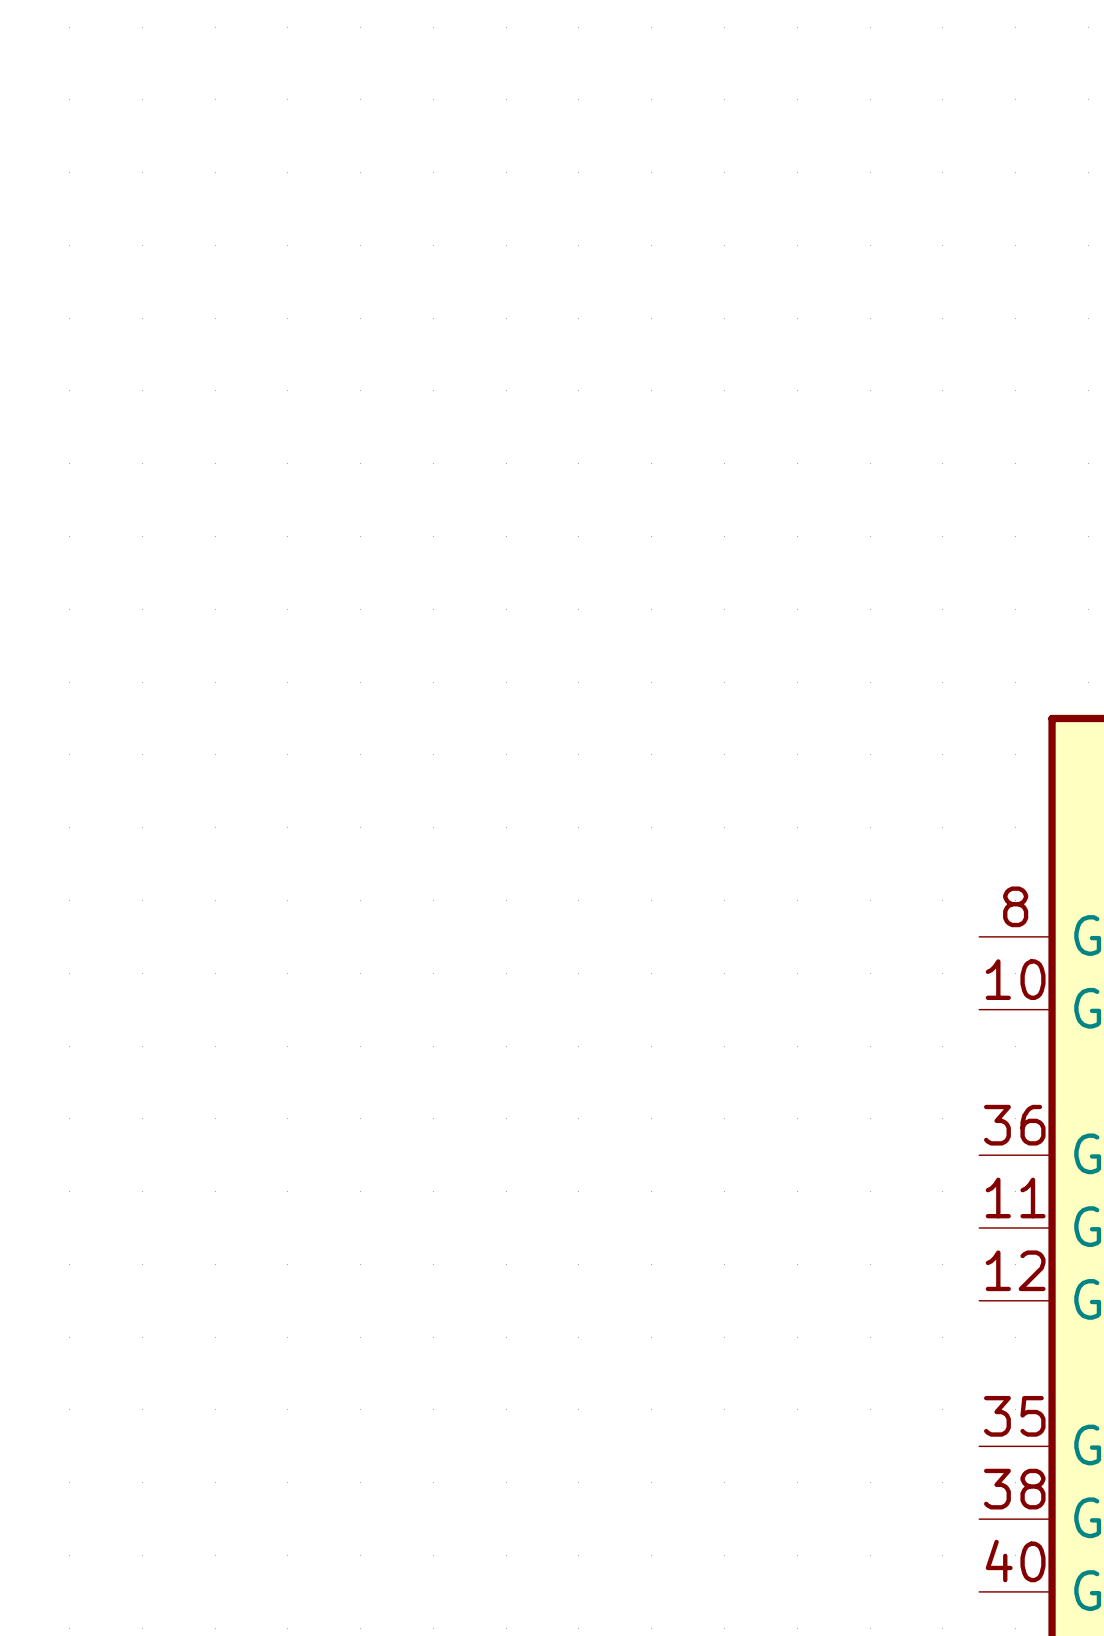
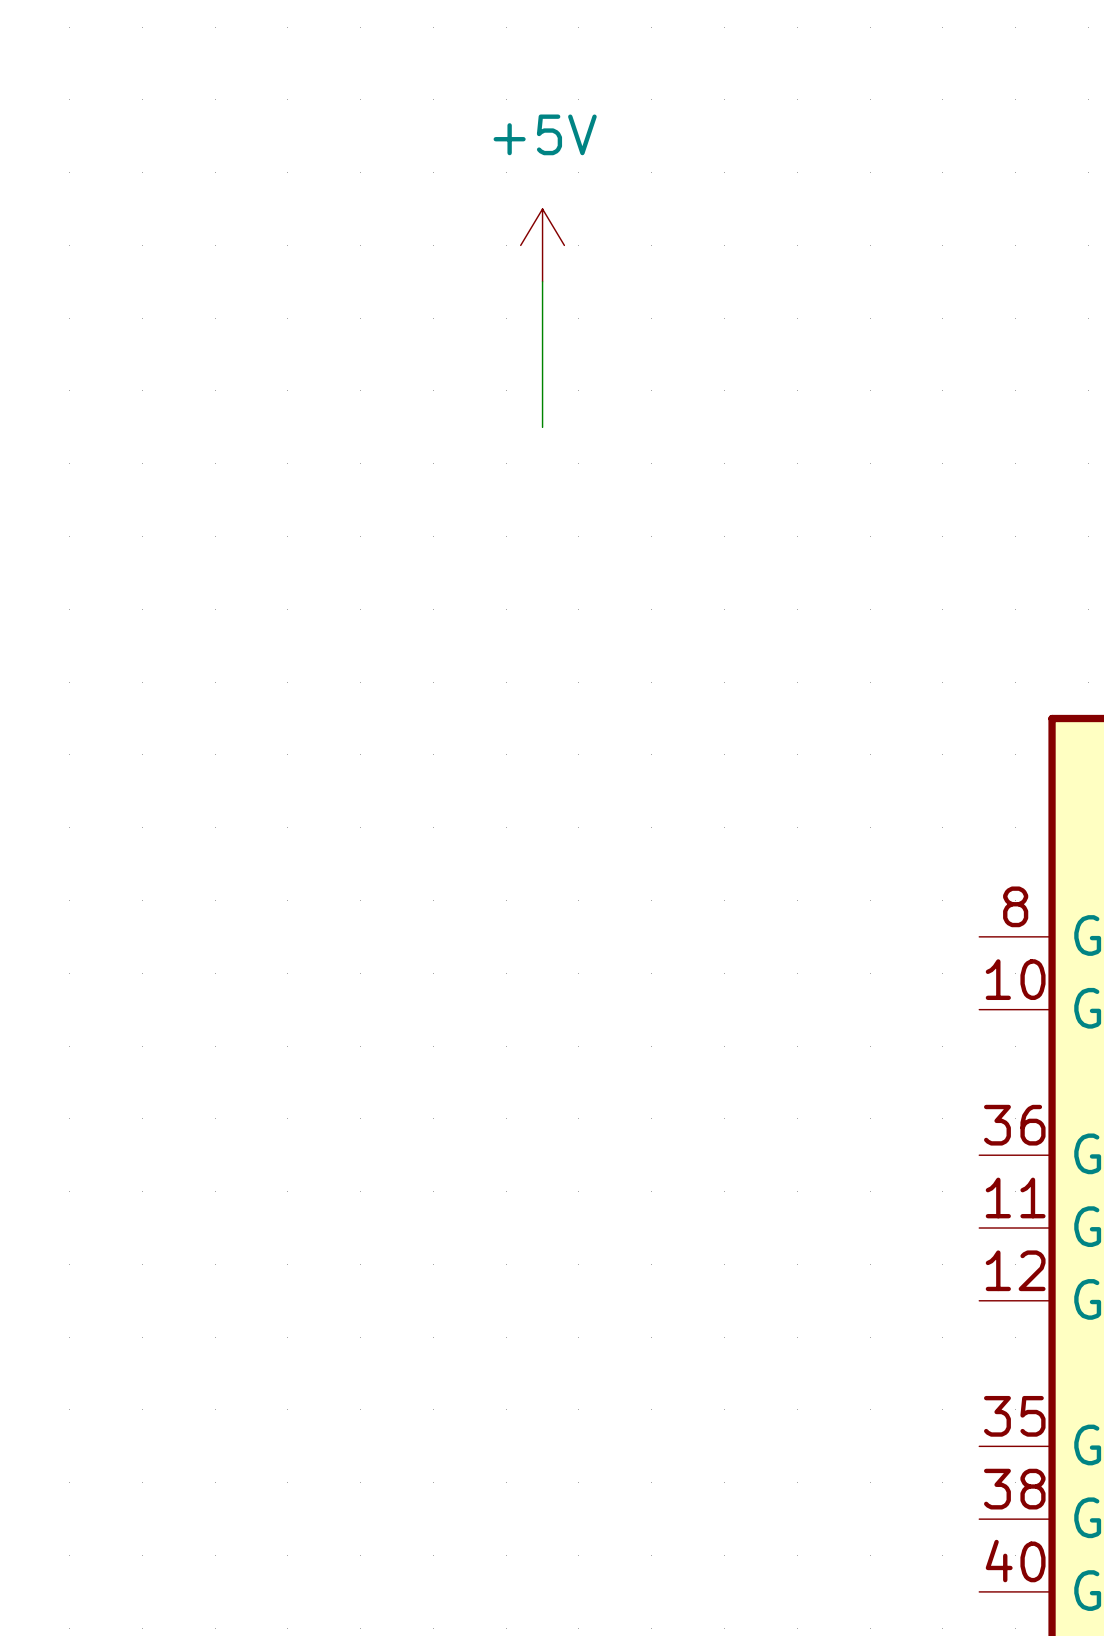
power symbol: none -> +5V (542, 245)
wire: none -> (542, 281) (542, 427)

